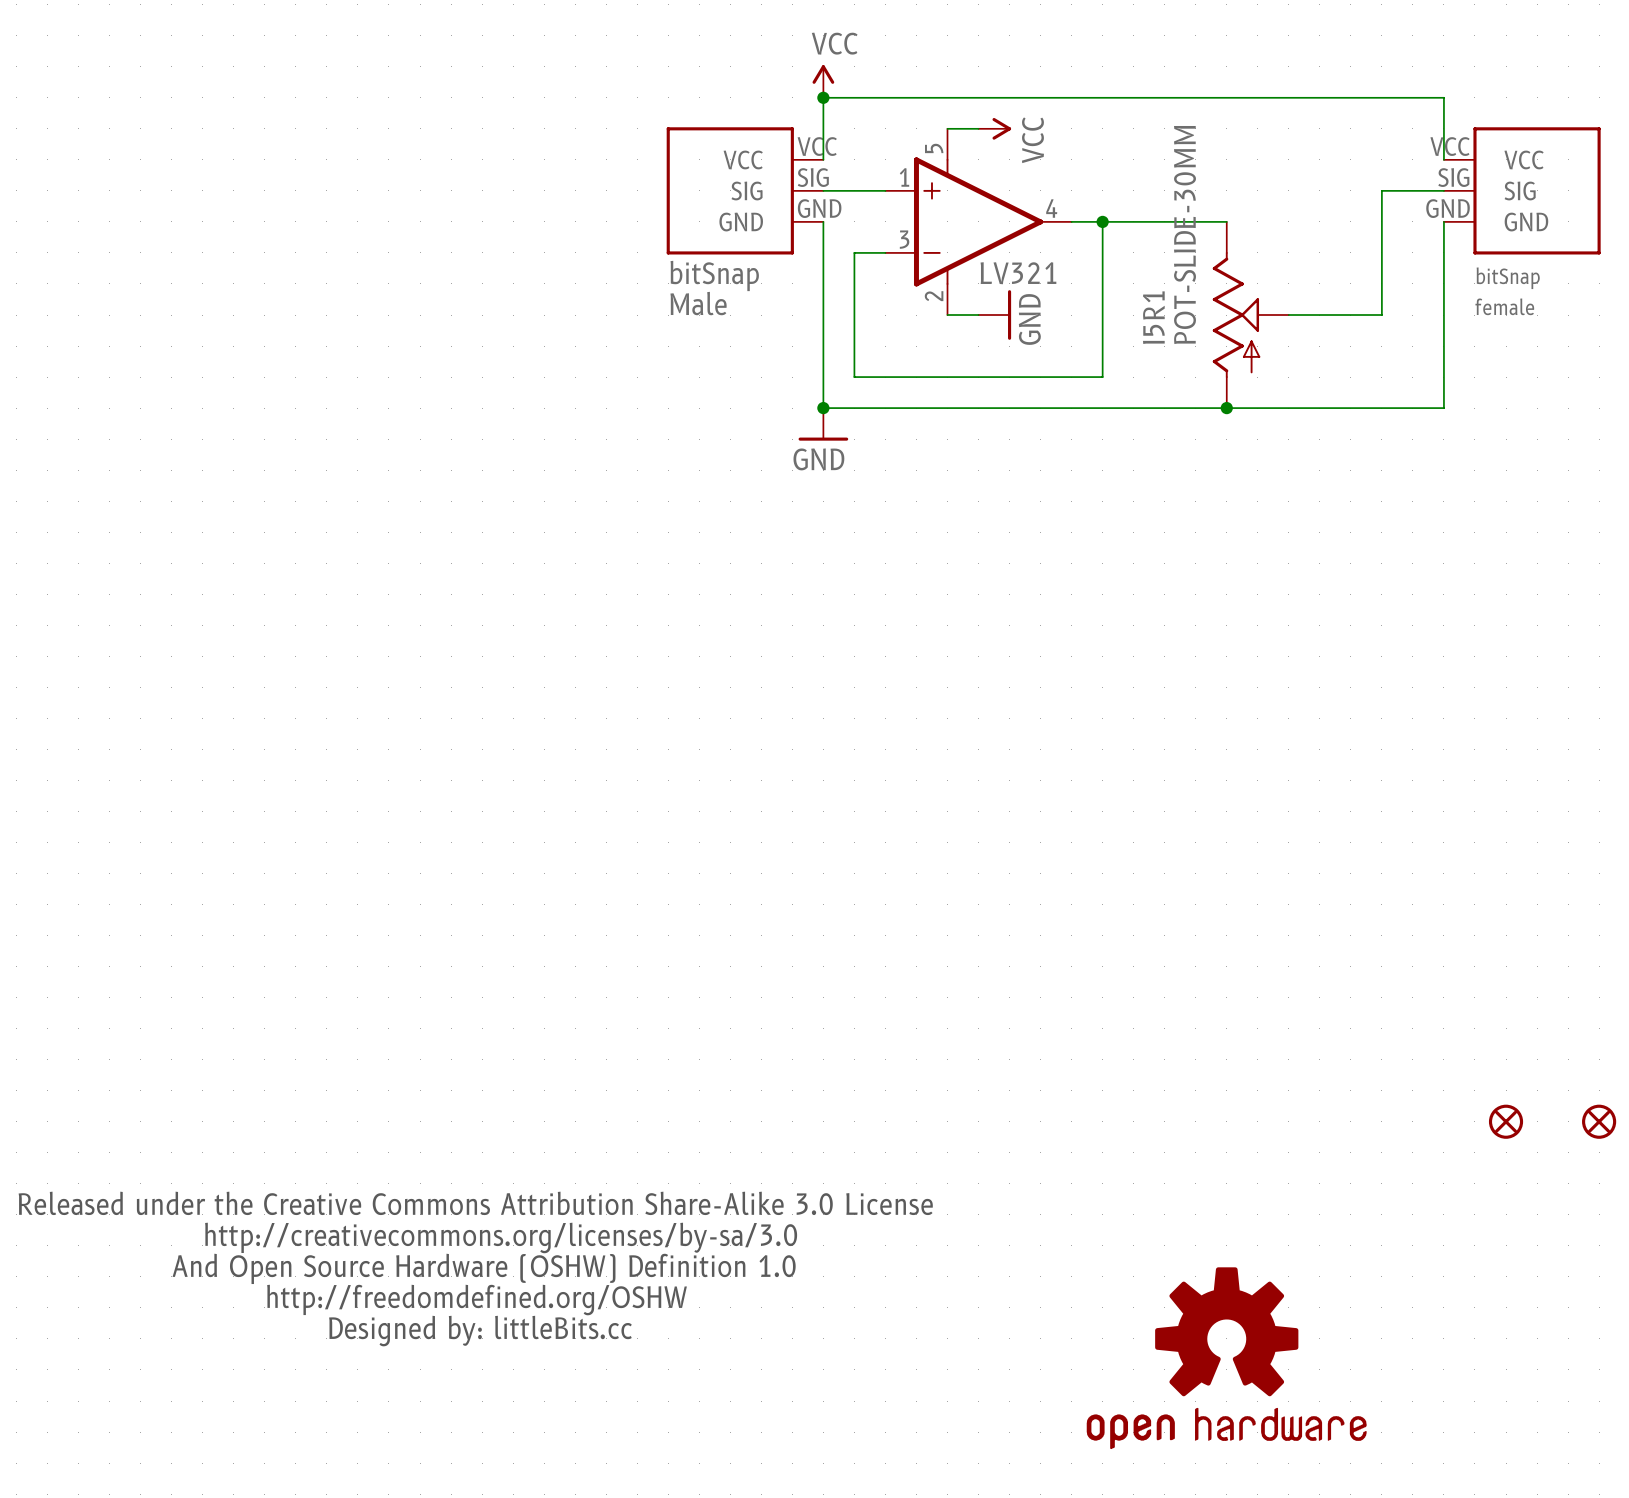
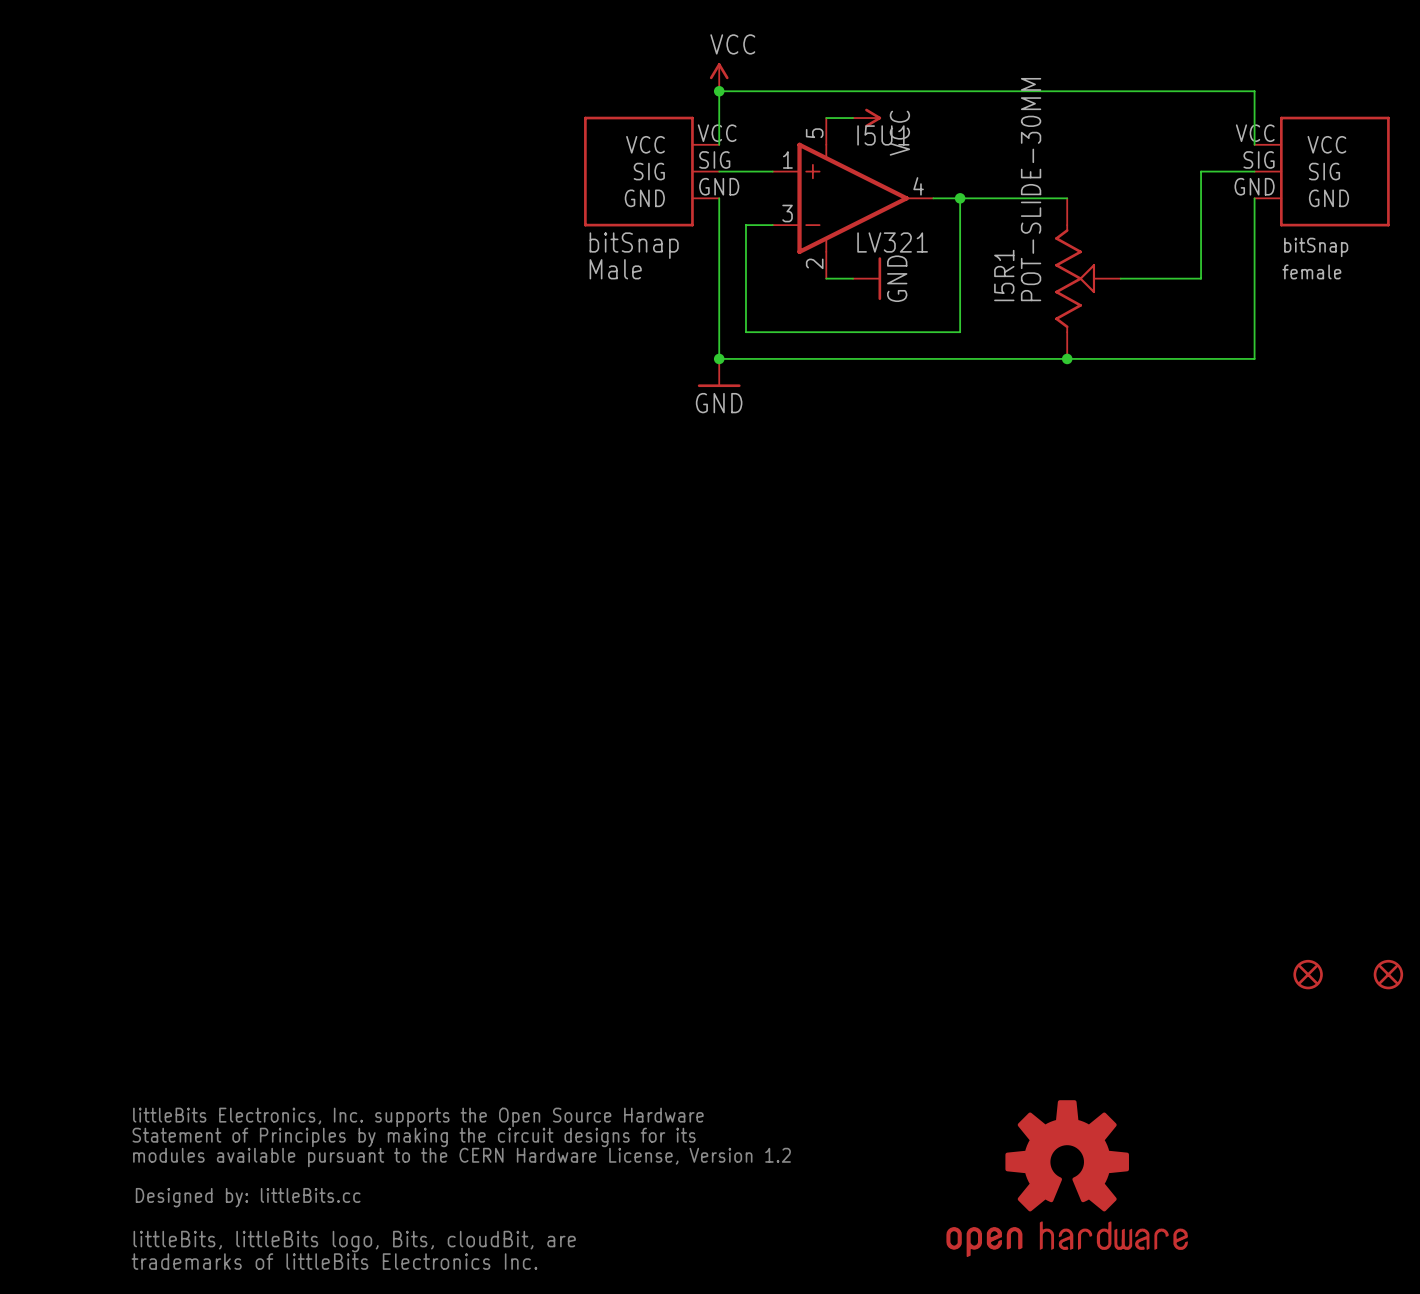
I5U1 name: none -> I5U1 (883, 135)
I5R1 symbol: [1212, 221, 1289, 409] -> [1055, 198, 1121, 359]
part: (475, 1269) -> none
part: none -> (461, 1188)

